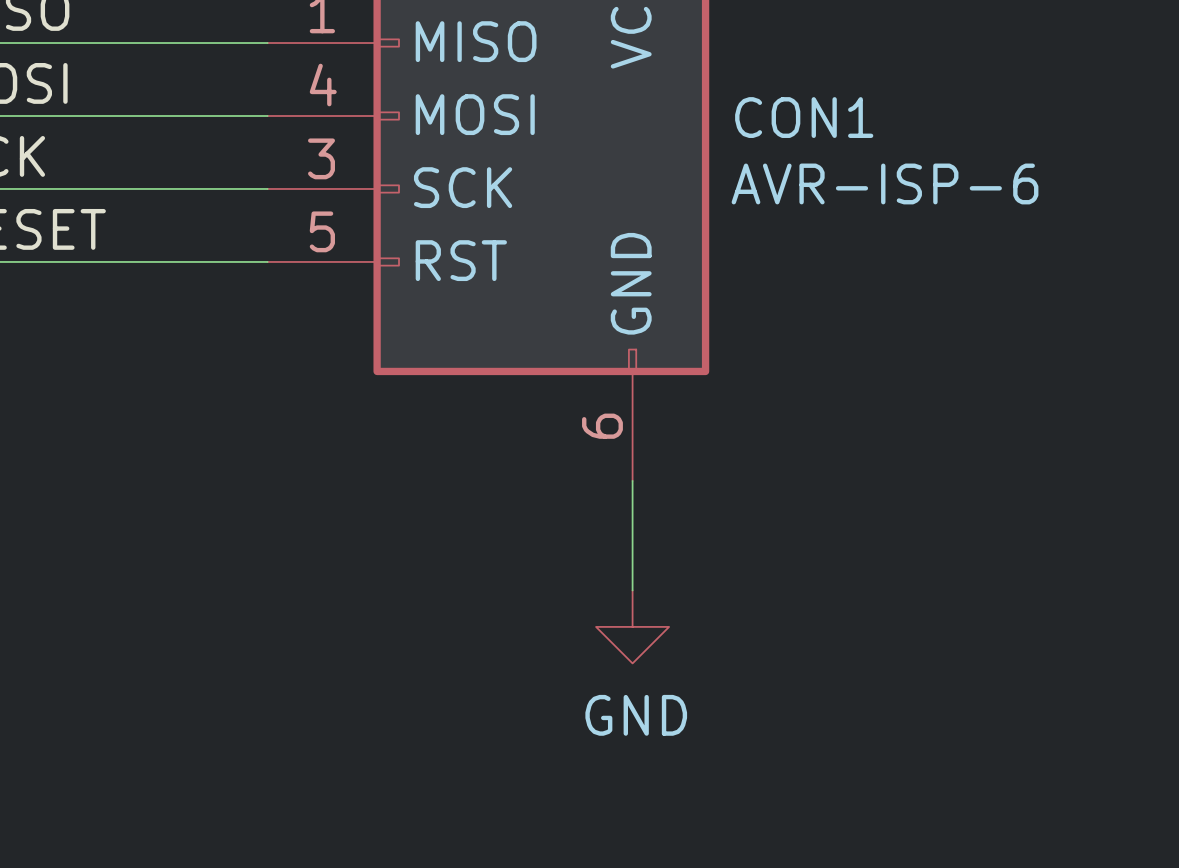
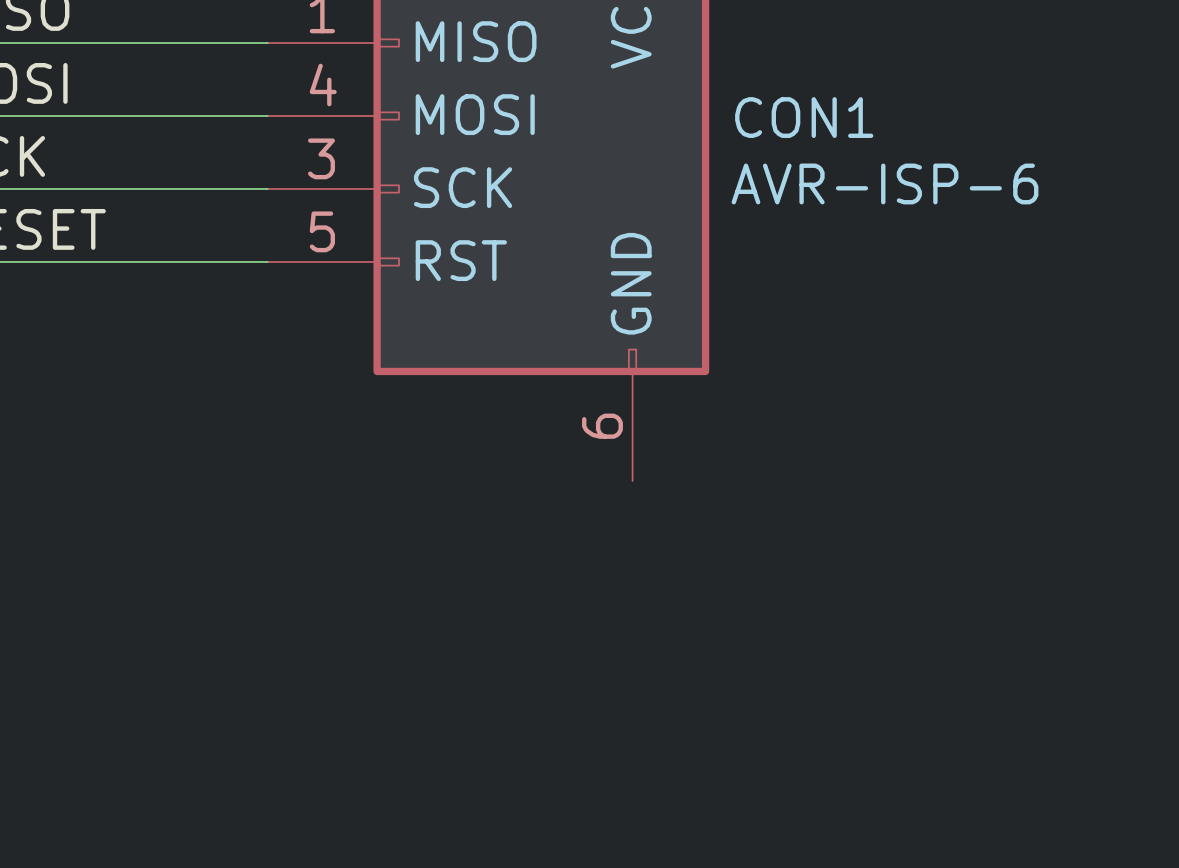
wire: (632, 480) (632, 590) -> none
power symbol: GND (632, 626) -> none

